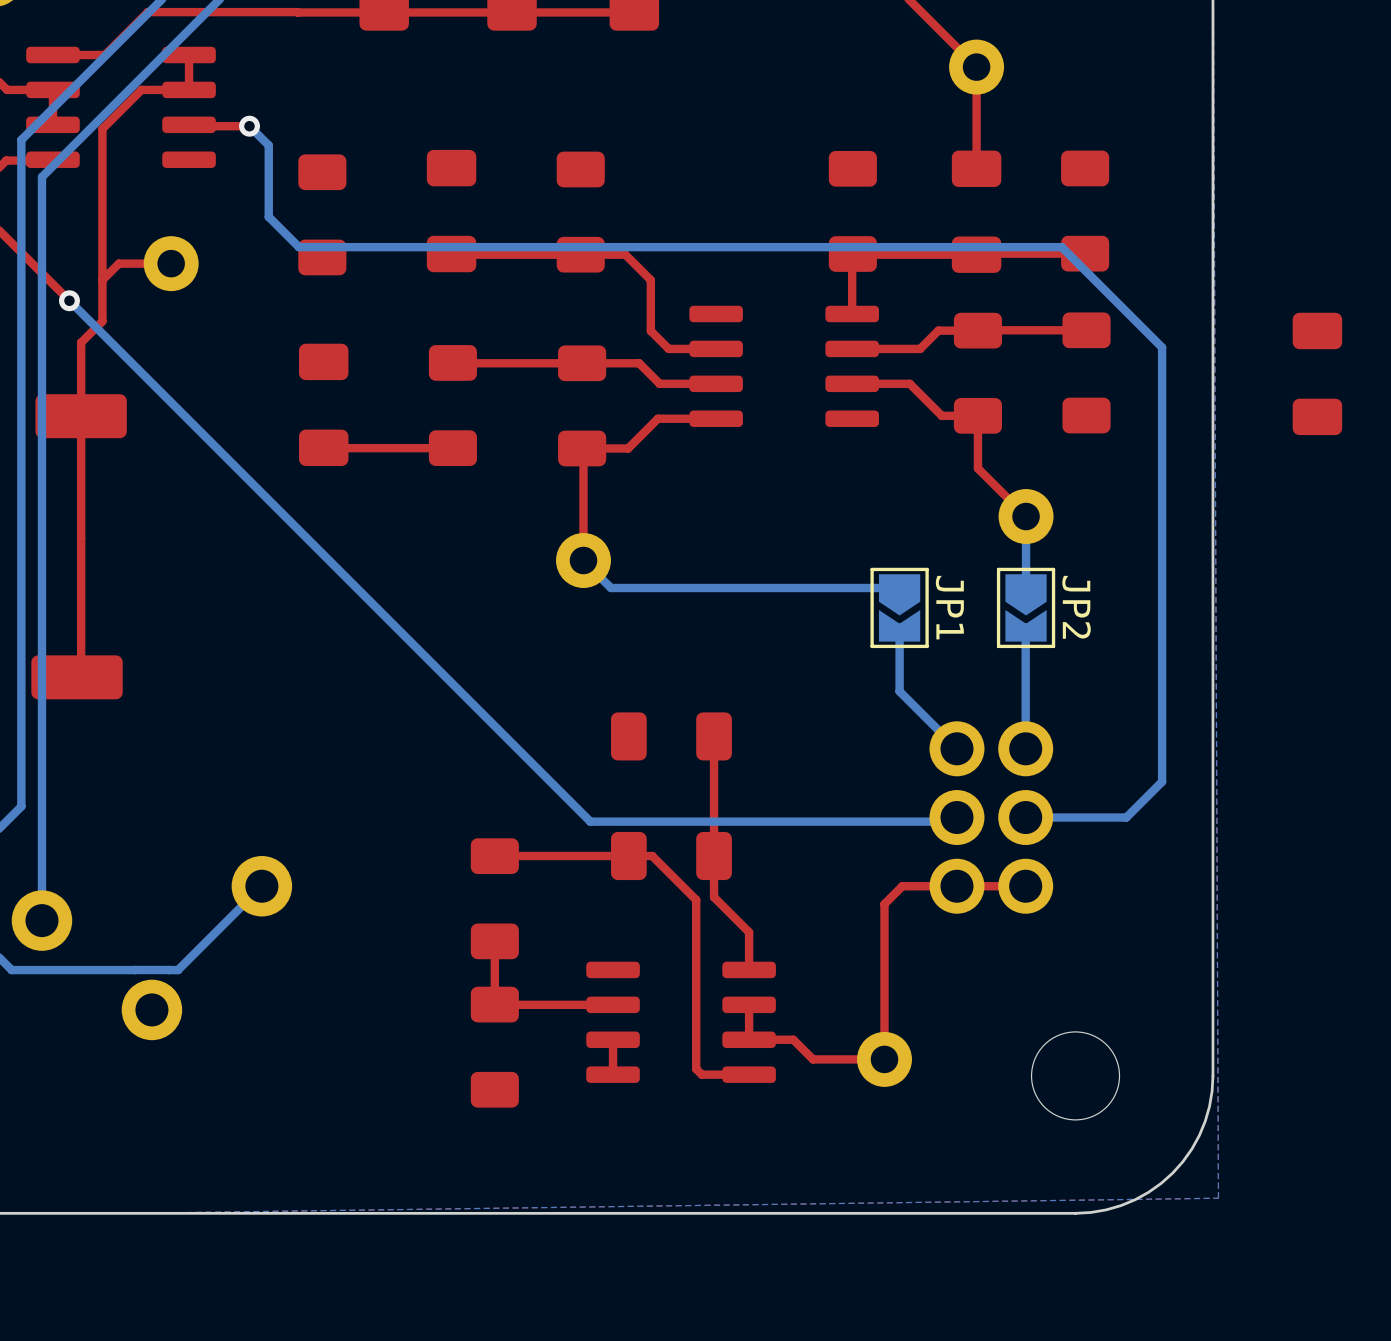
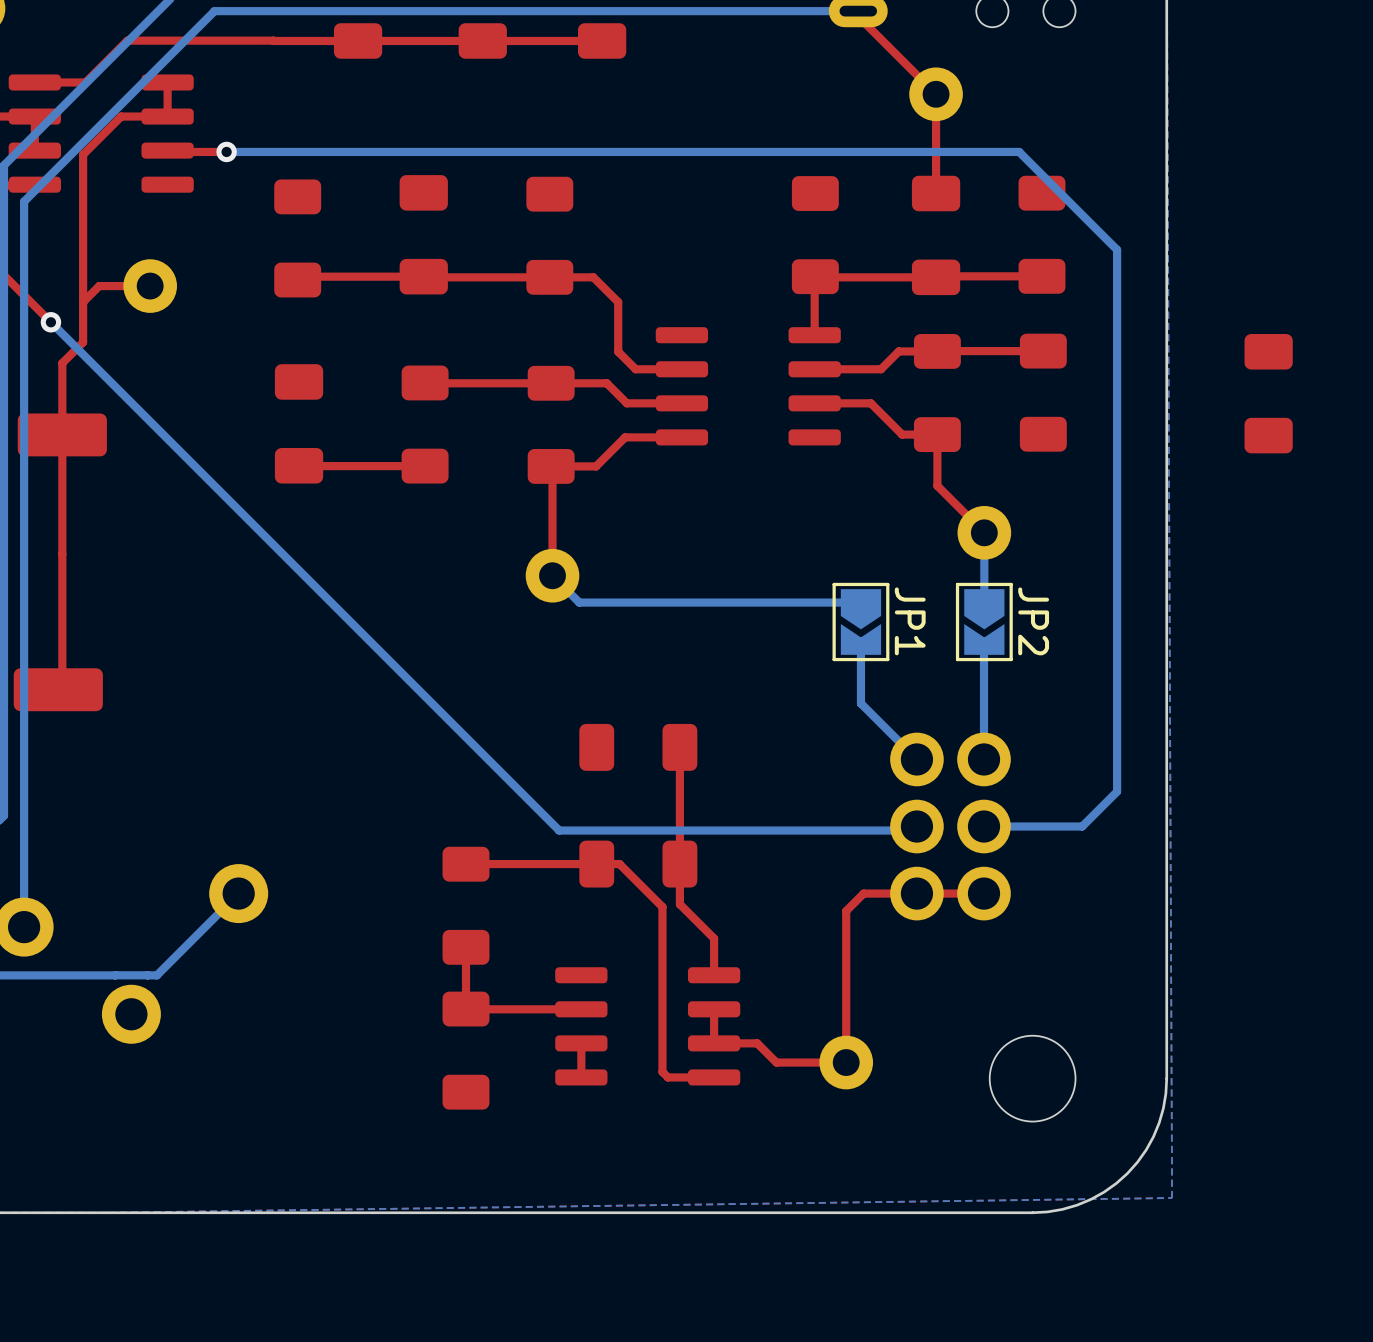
bottom track: (249, 126) (268, 145) (268, 216) (298, 247) (1061, 247) (1162, 347) -> (226, 151) (1019, 151) (1117, 249) (1117, 367)
top track: none -> (423, 276) (297, 276)

